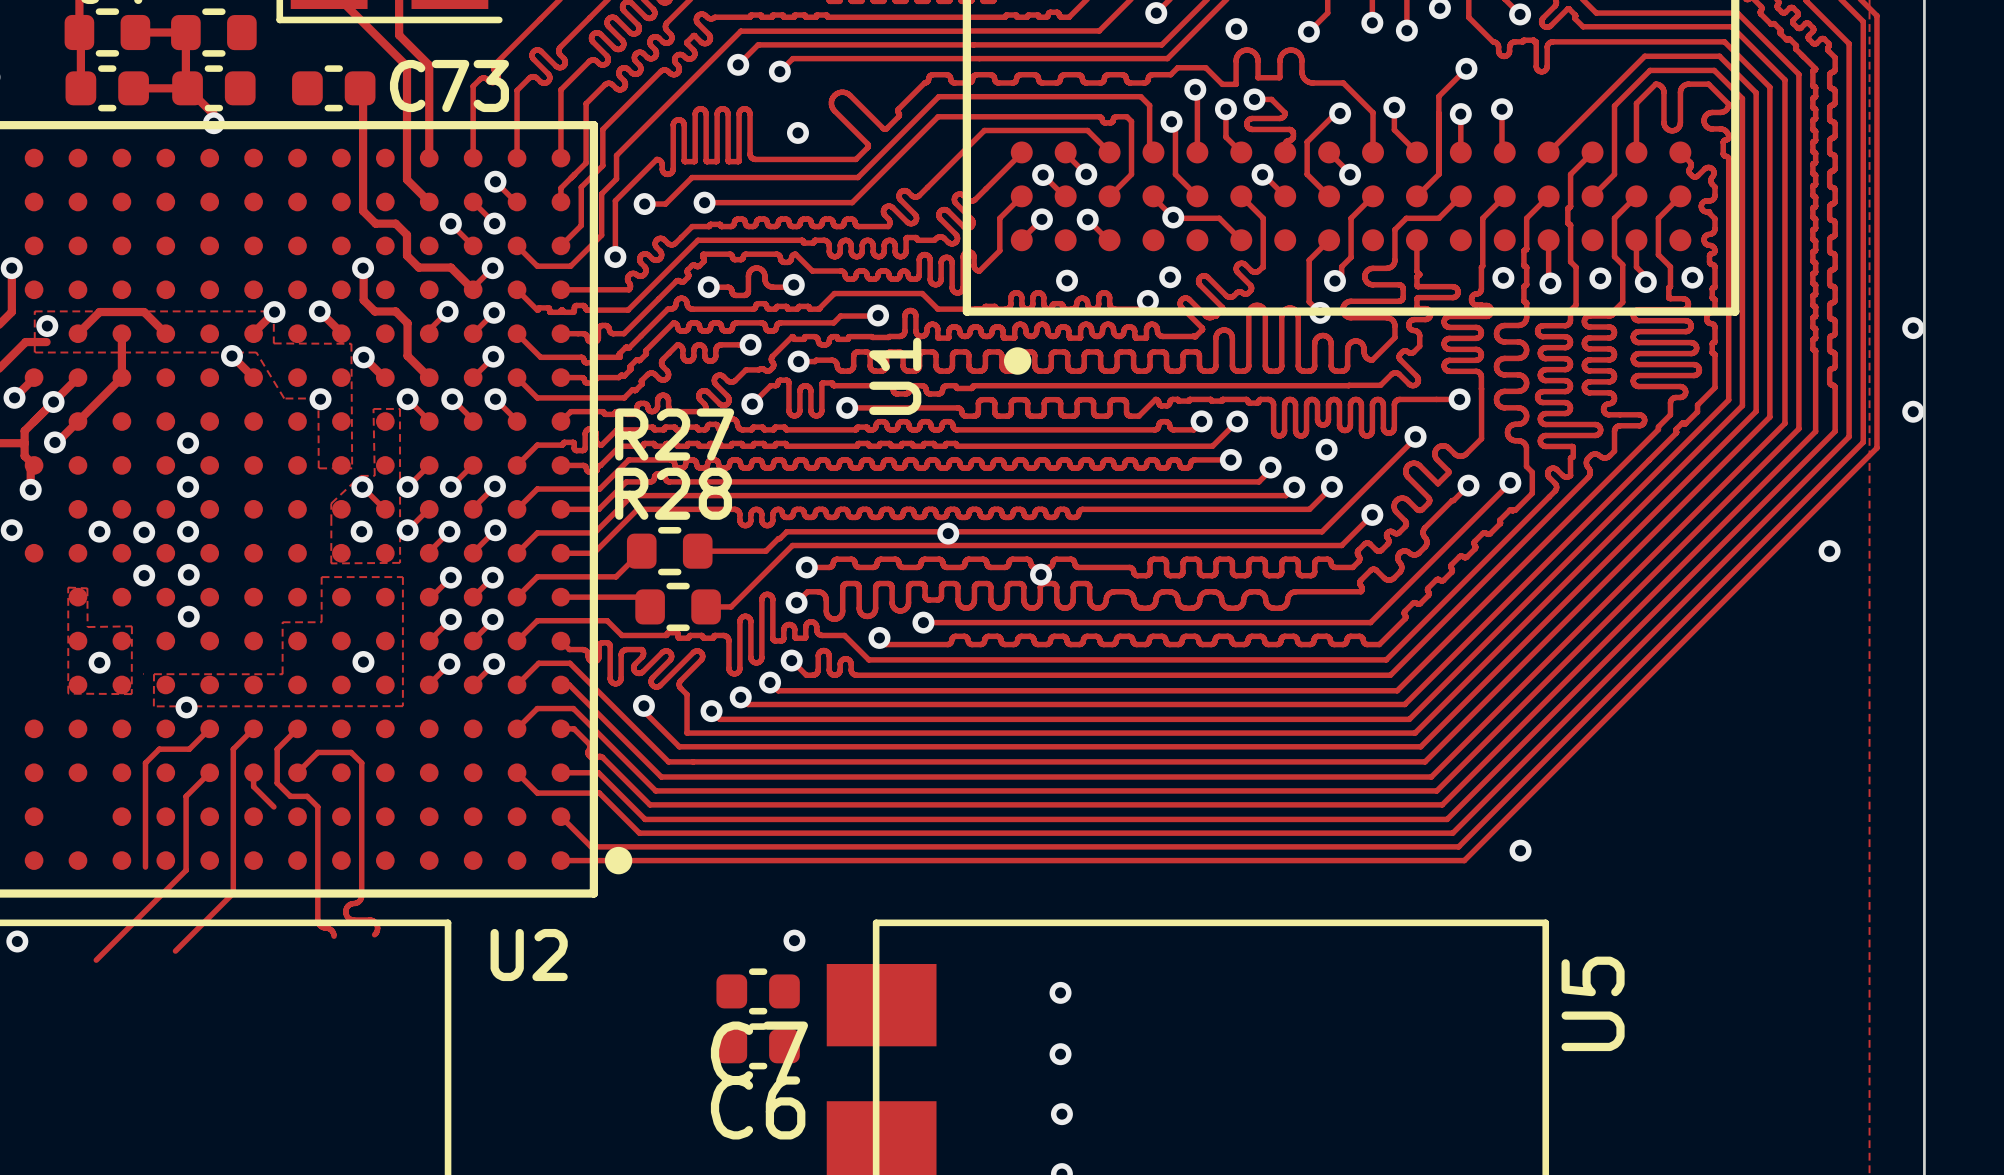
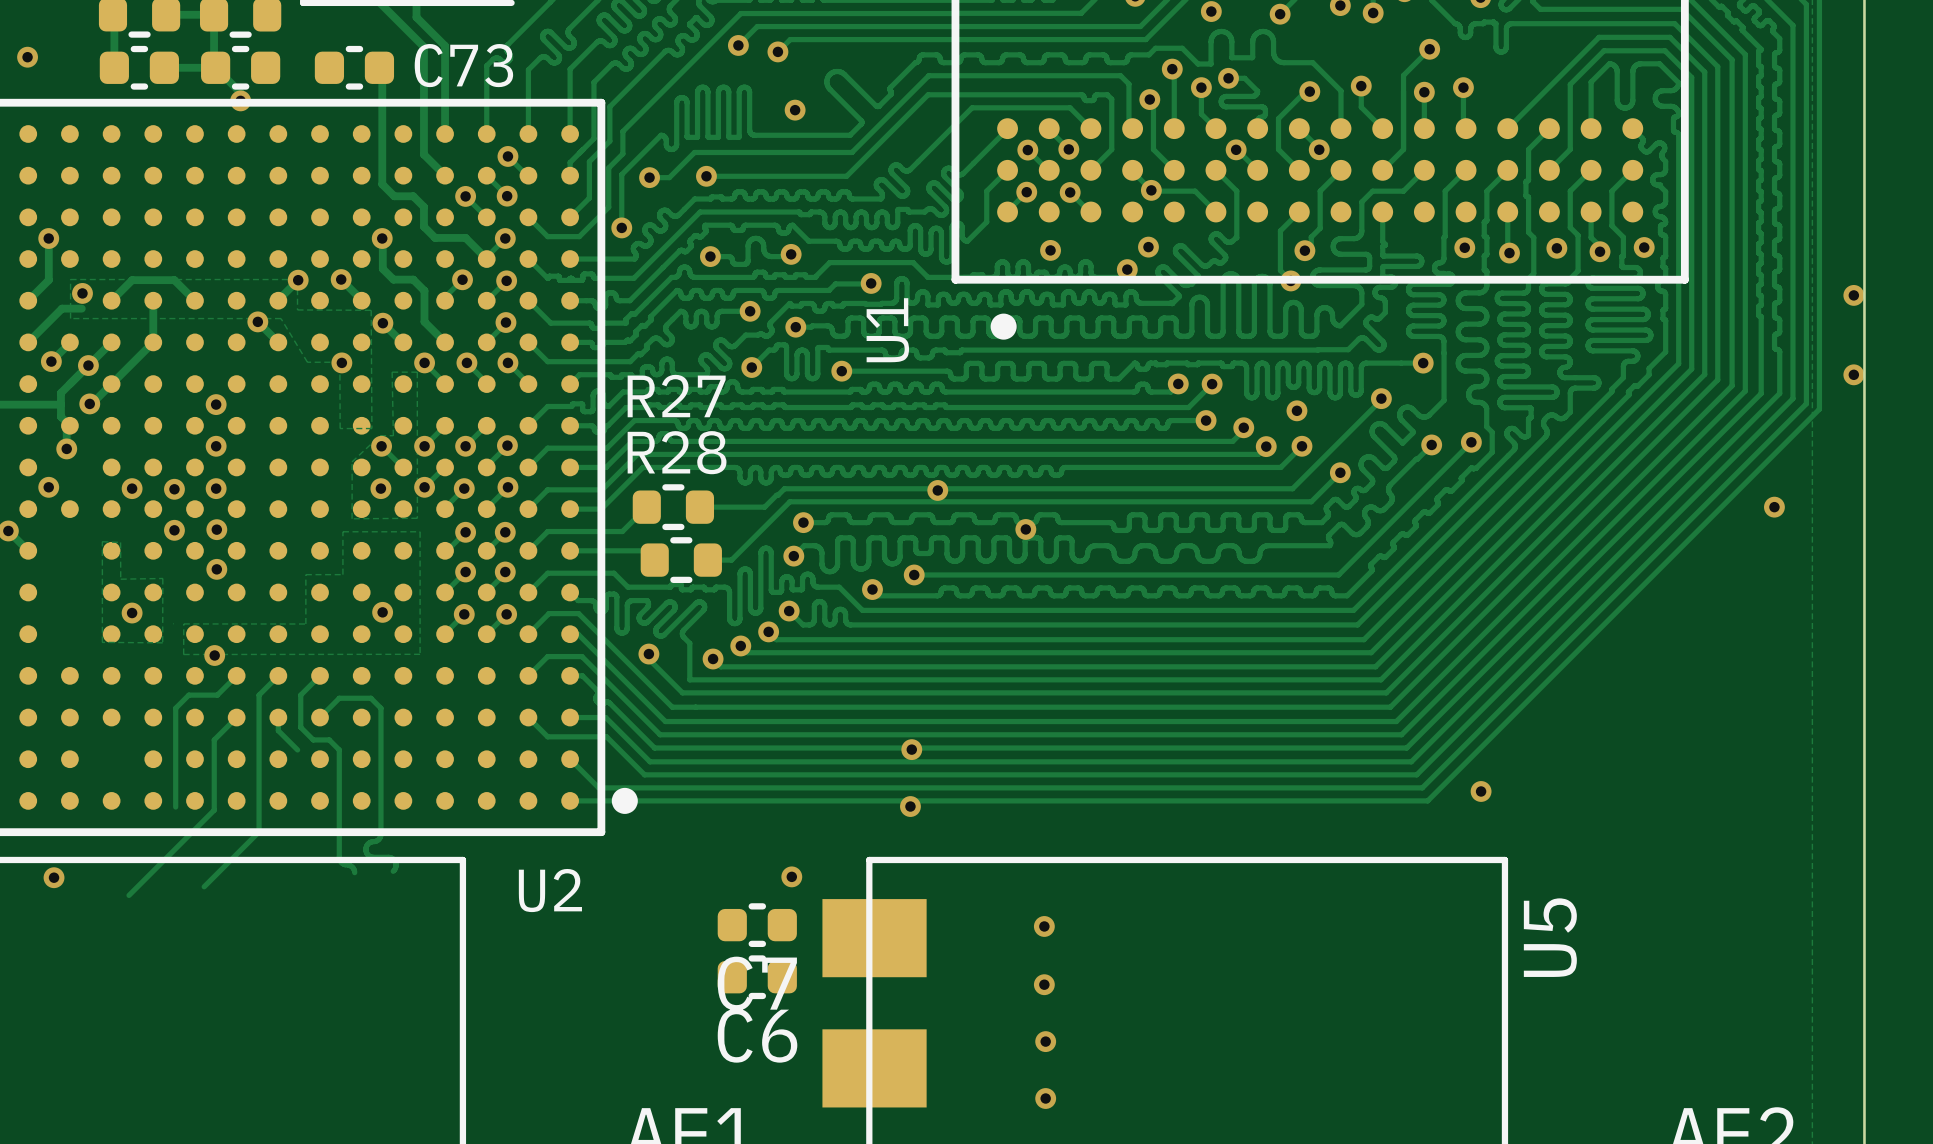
via: none -> (911, 749)
via: none -> (910, 806)

